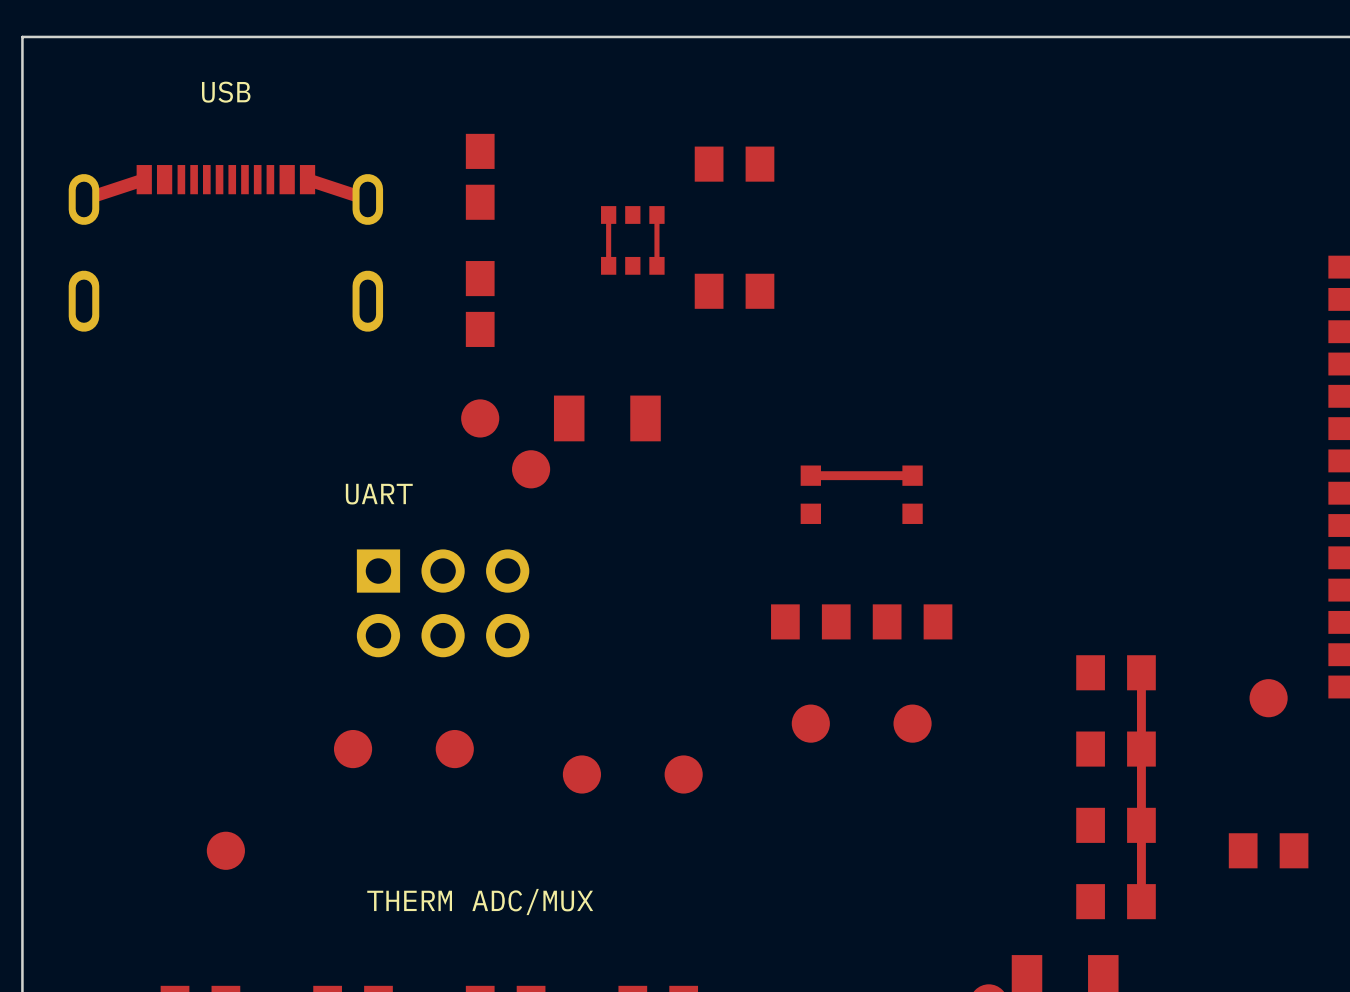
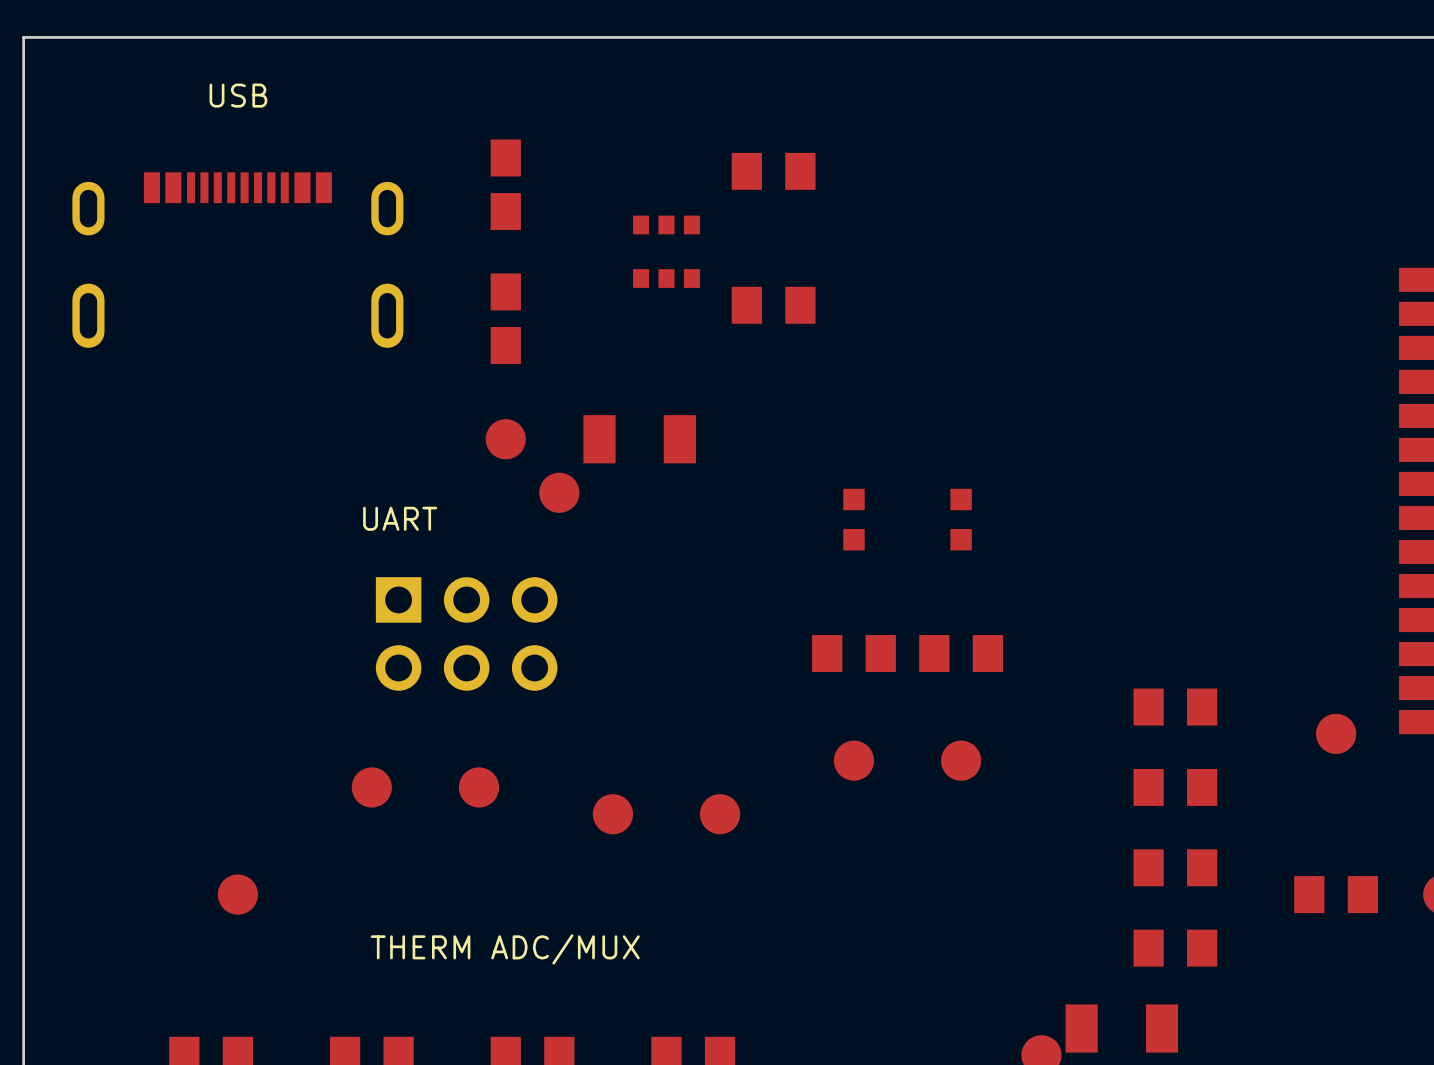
track: (144, 179) (83, 199) -> none
track: (307, 179) (367, 199) -> none
track: (608, 214) (608, 265) -> none
track: (656, 214) (656, 265) -> none
track: (810, 475) (912, 475) -> none
track: (1141, 672) (1141, 901) -> none

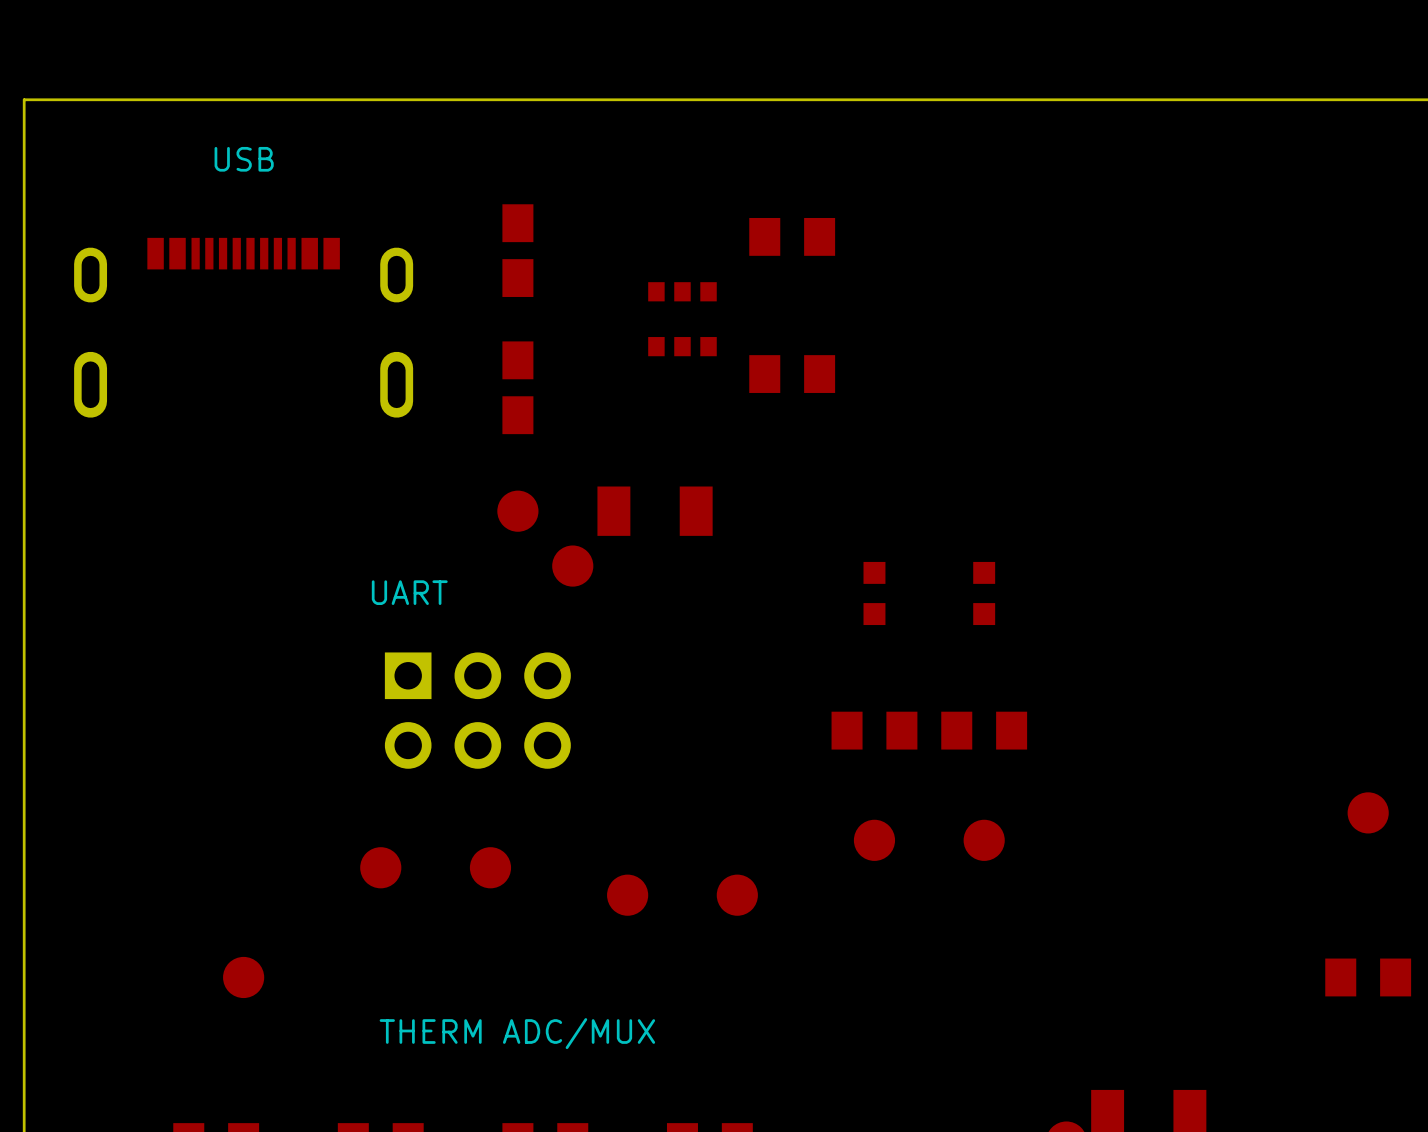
part: (1175, 707) -> none
part: (1175, 787) -> none
part: (1175, 867) -> none
part: (1175, 948) -> none

